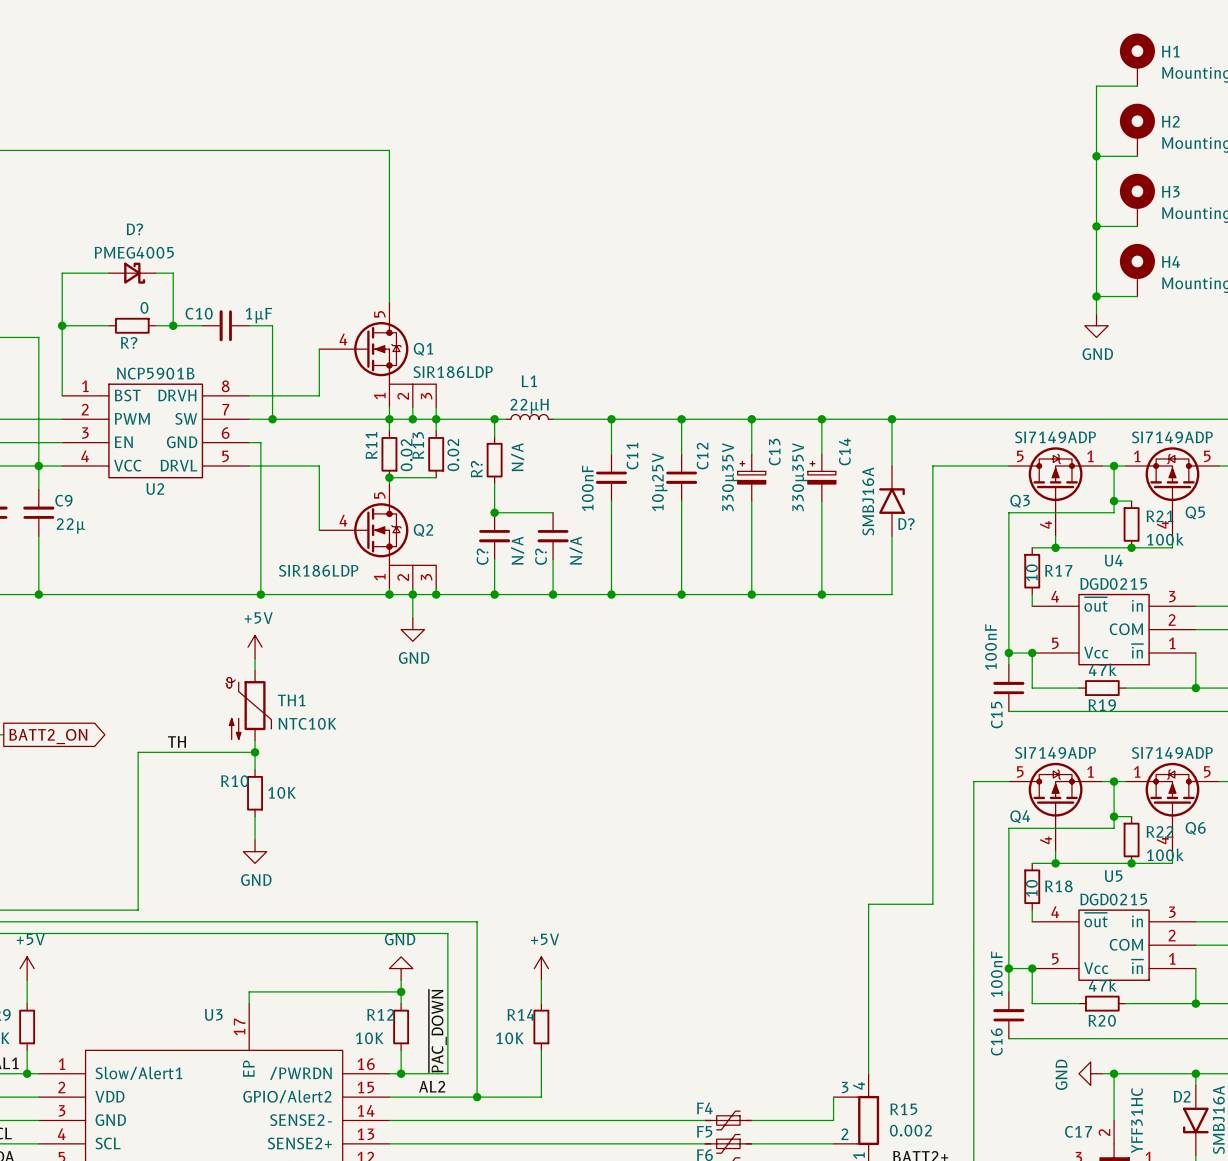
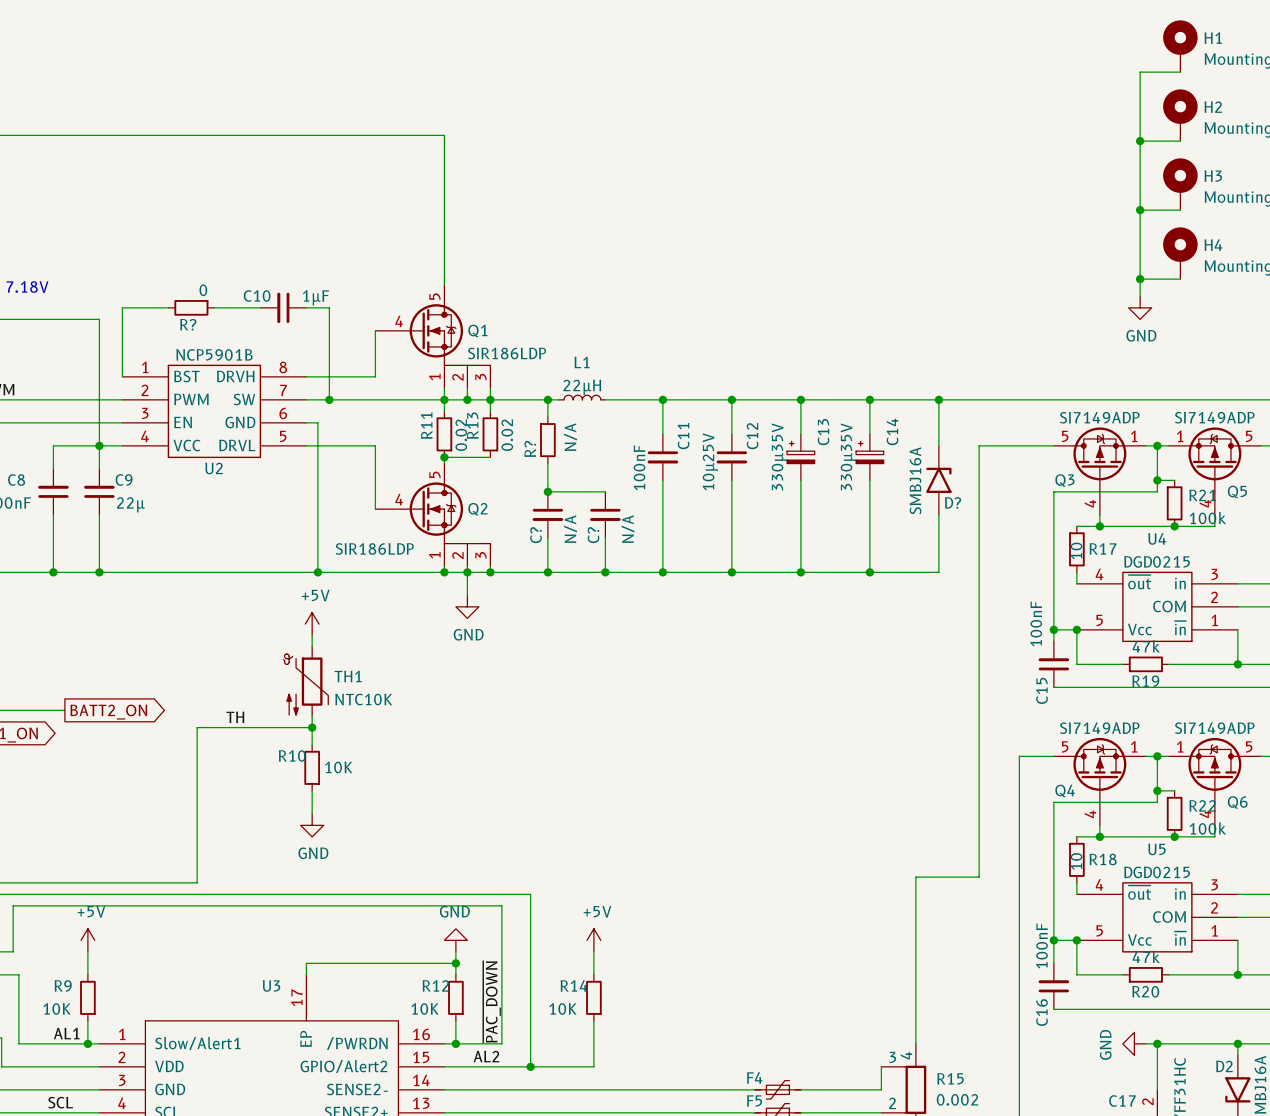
wire: (108, 273) (62, 273) (62, 325) -> none
D?: PMEG4005 (132, 273) -> none
wire: (155, 273) (173, 273) (173, 325) -> none
junction: (62, 325) -> none
junction: (173, 325) -> none

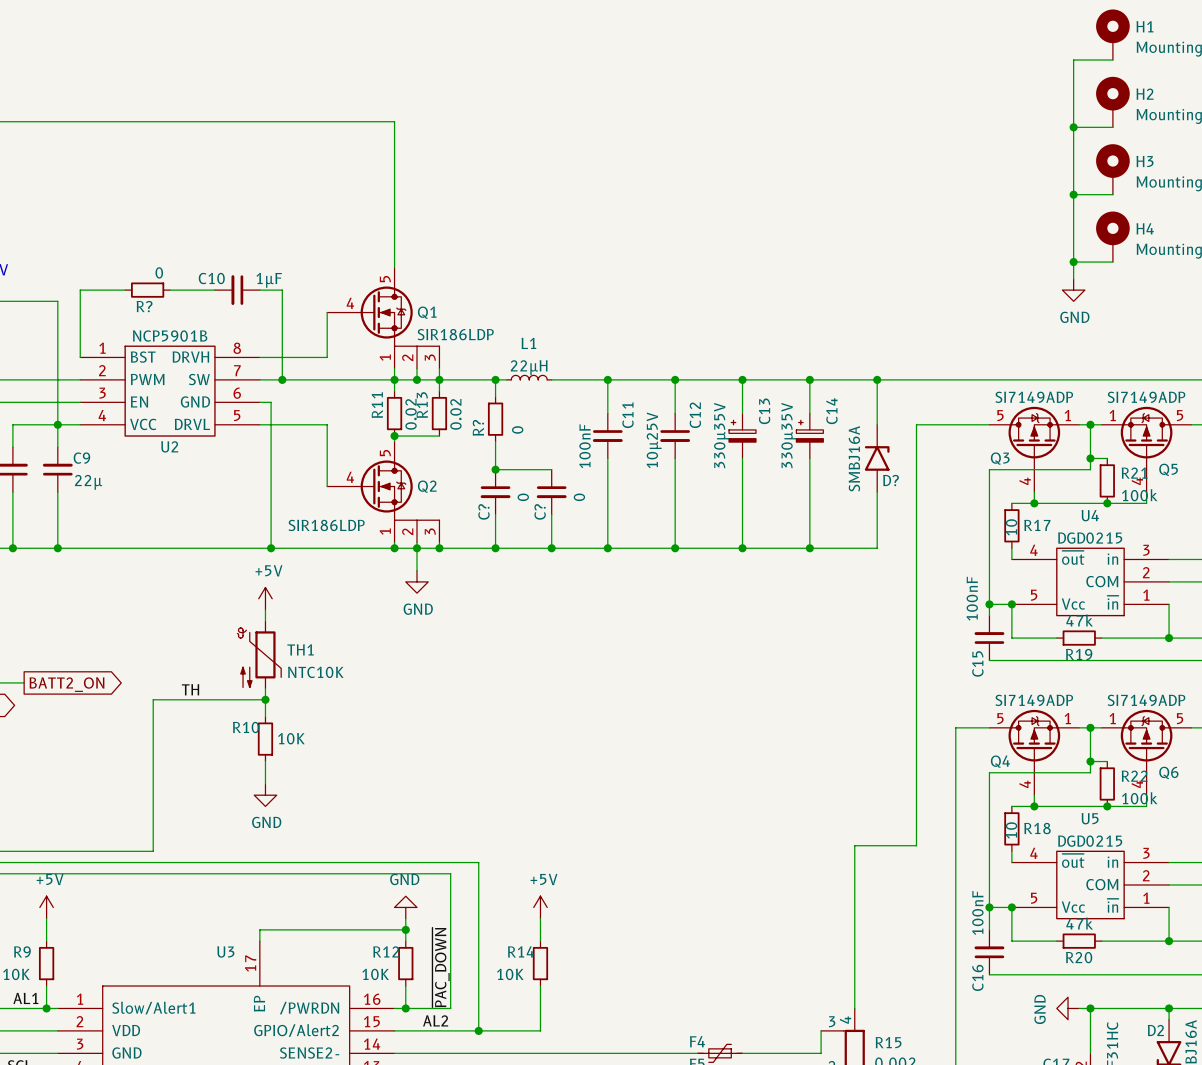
R? value: N/A (570, 437) -> 0 (517, 429)
C? value: N/A (570, 529) -> 0 (523, 497)
C? value: N/A (628, 529) -> 0 (579, 497)

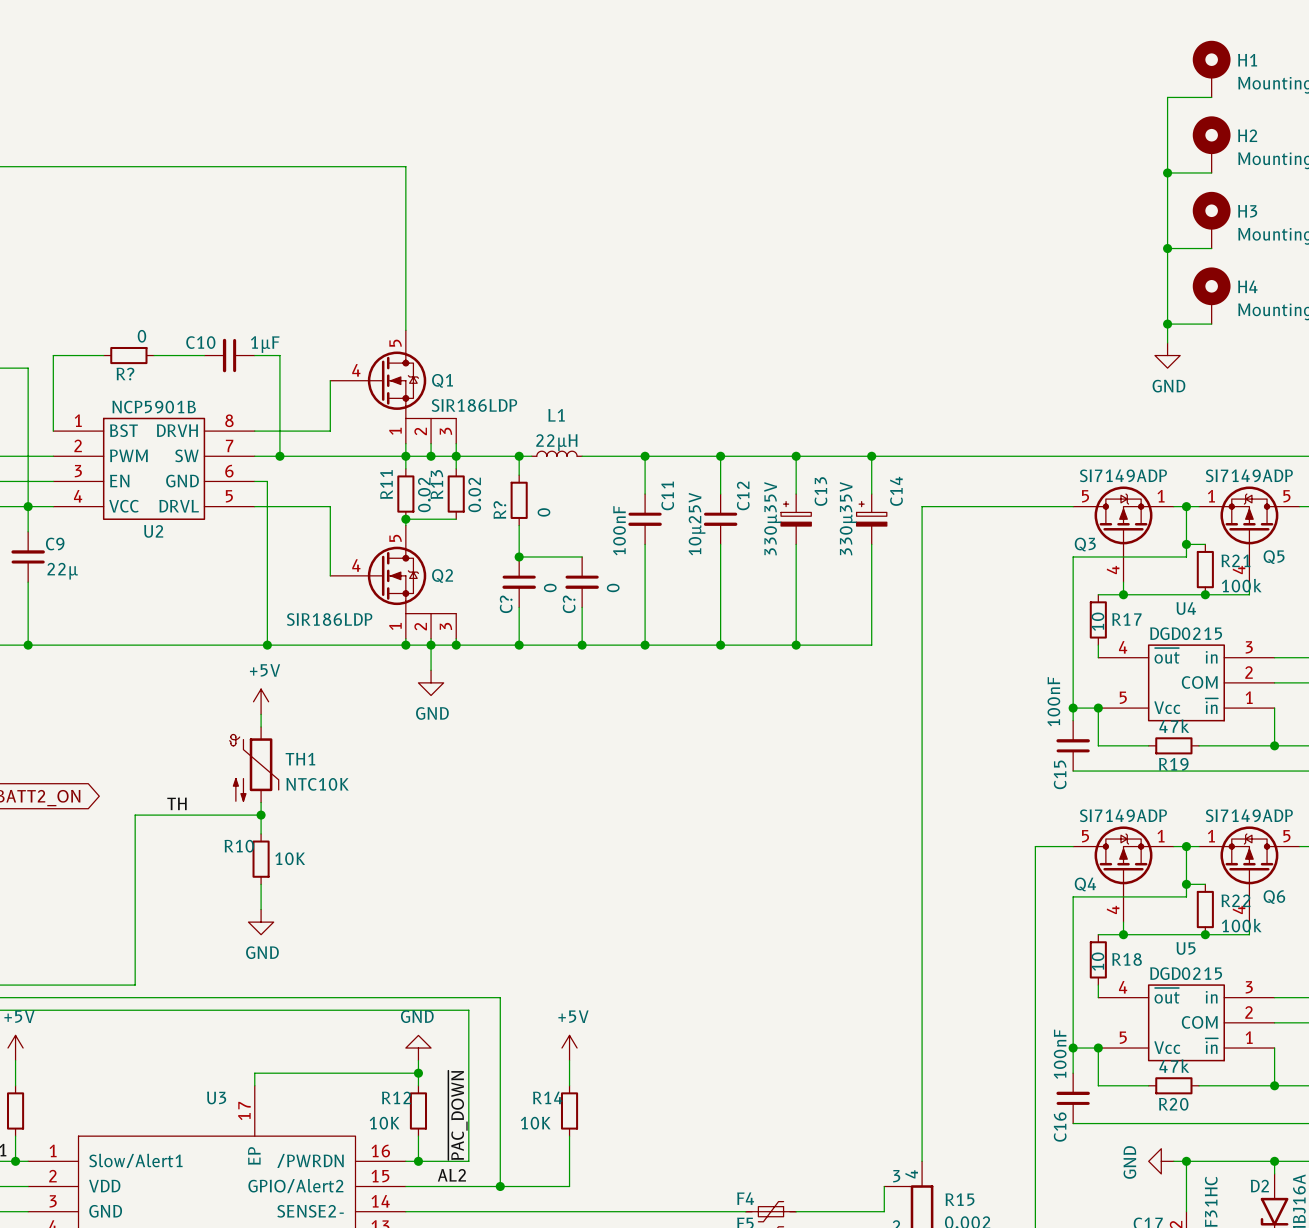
wire: (877, 379) (877, 424) -> none
junction: (877, 379) -> none
wire: (916, 424) (916, 845) (854, 845) -> (991, 506) (922, 506) (922, 978)
D?: SMBJ16A (877, 458) -> none
wire: (877, 492) (877, 548) (809, 548) -> none
junction: (809, 548) -> none

